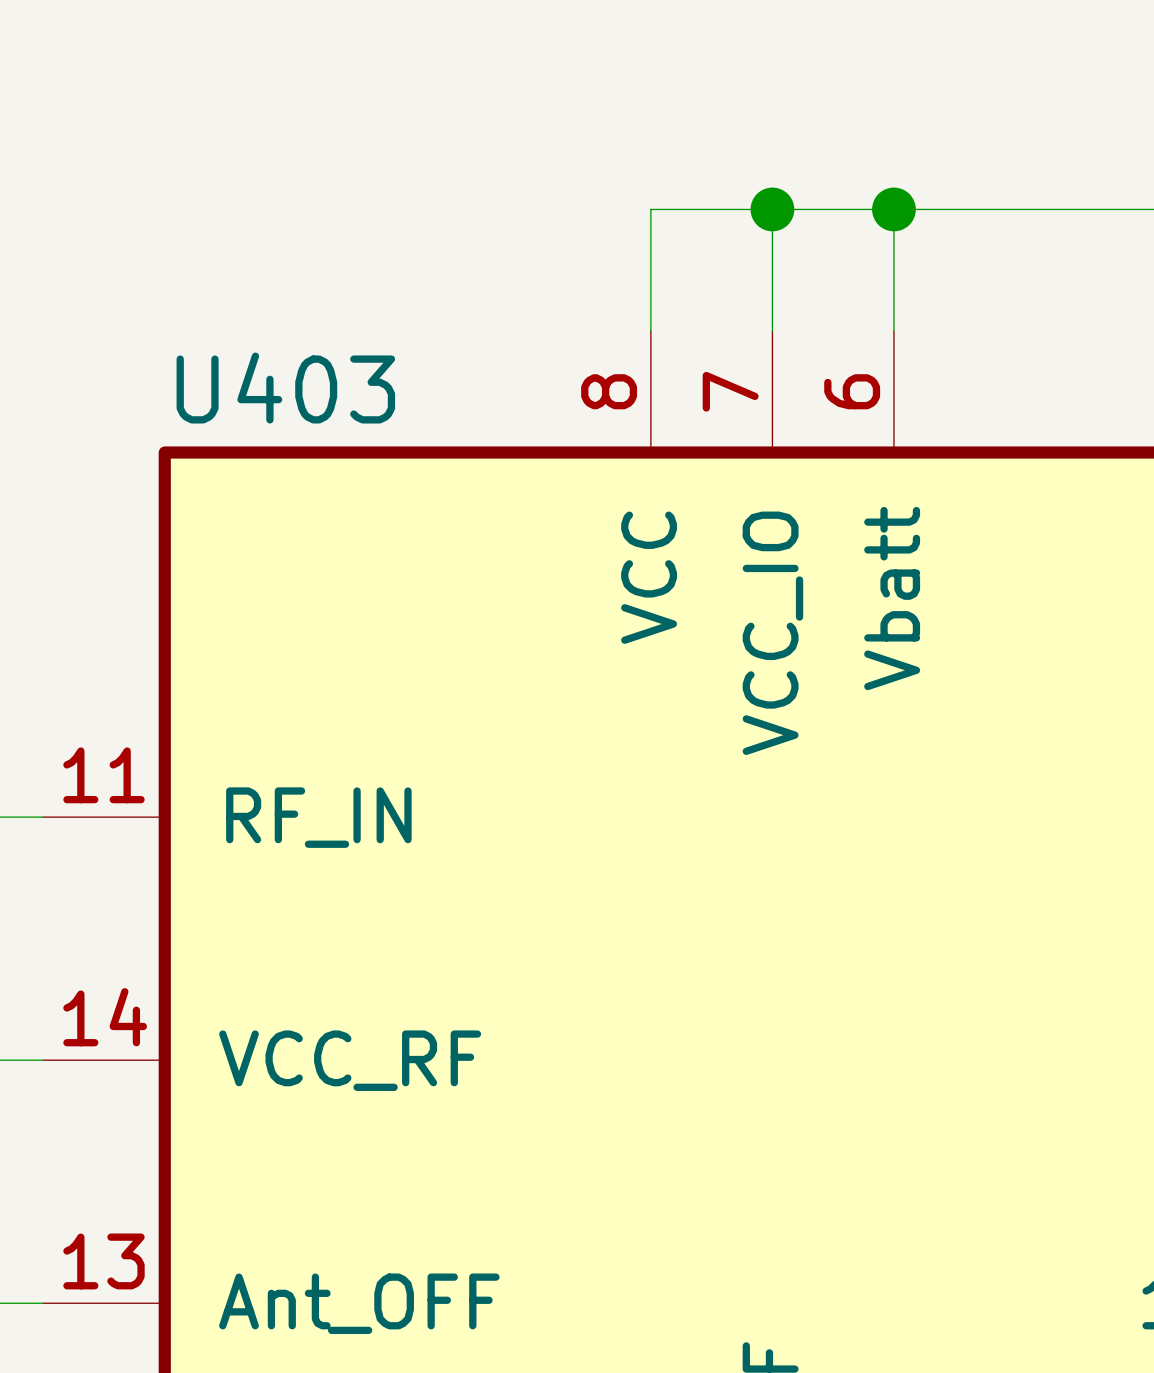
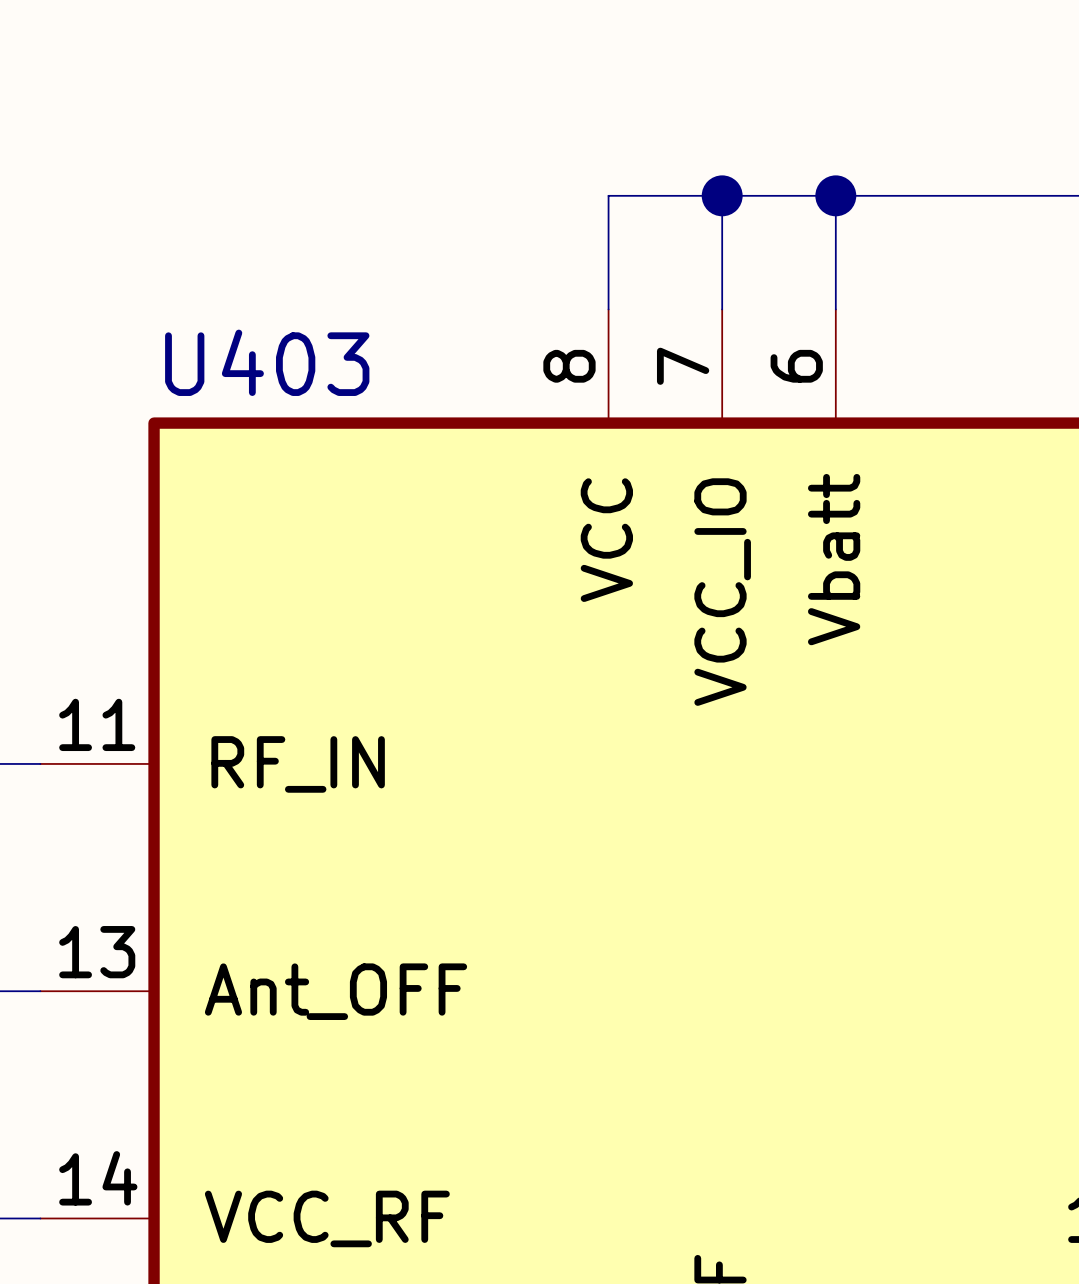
U403 pin number: 14 (105, 1017) -> 13 (97, 952)
U403 pin name: VCC_RF (350, 1060) -> Ant_OFF (336, 991)
U403 pin number: 13 (103, 1261) -> 14 (98, 1178)
U403 pin name: Ant_OFF (359, 1303) -> VCC_RF (327, 1218)

